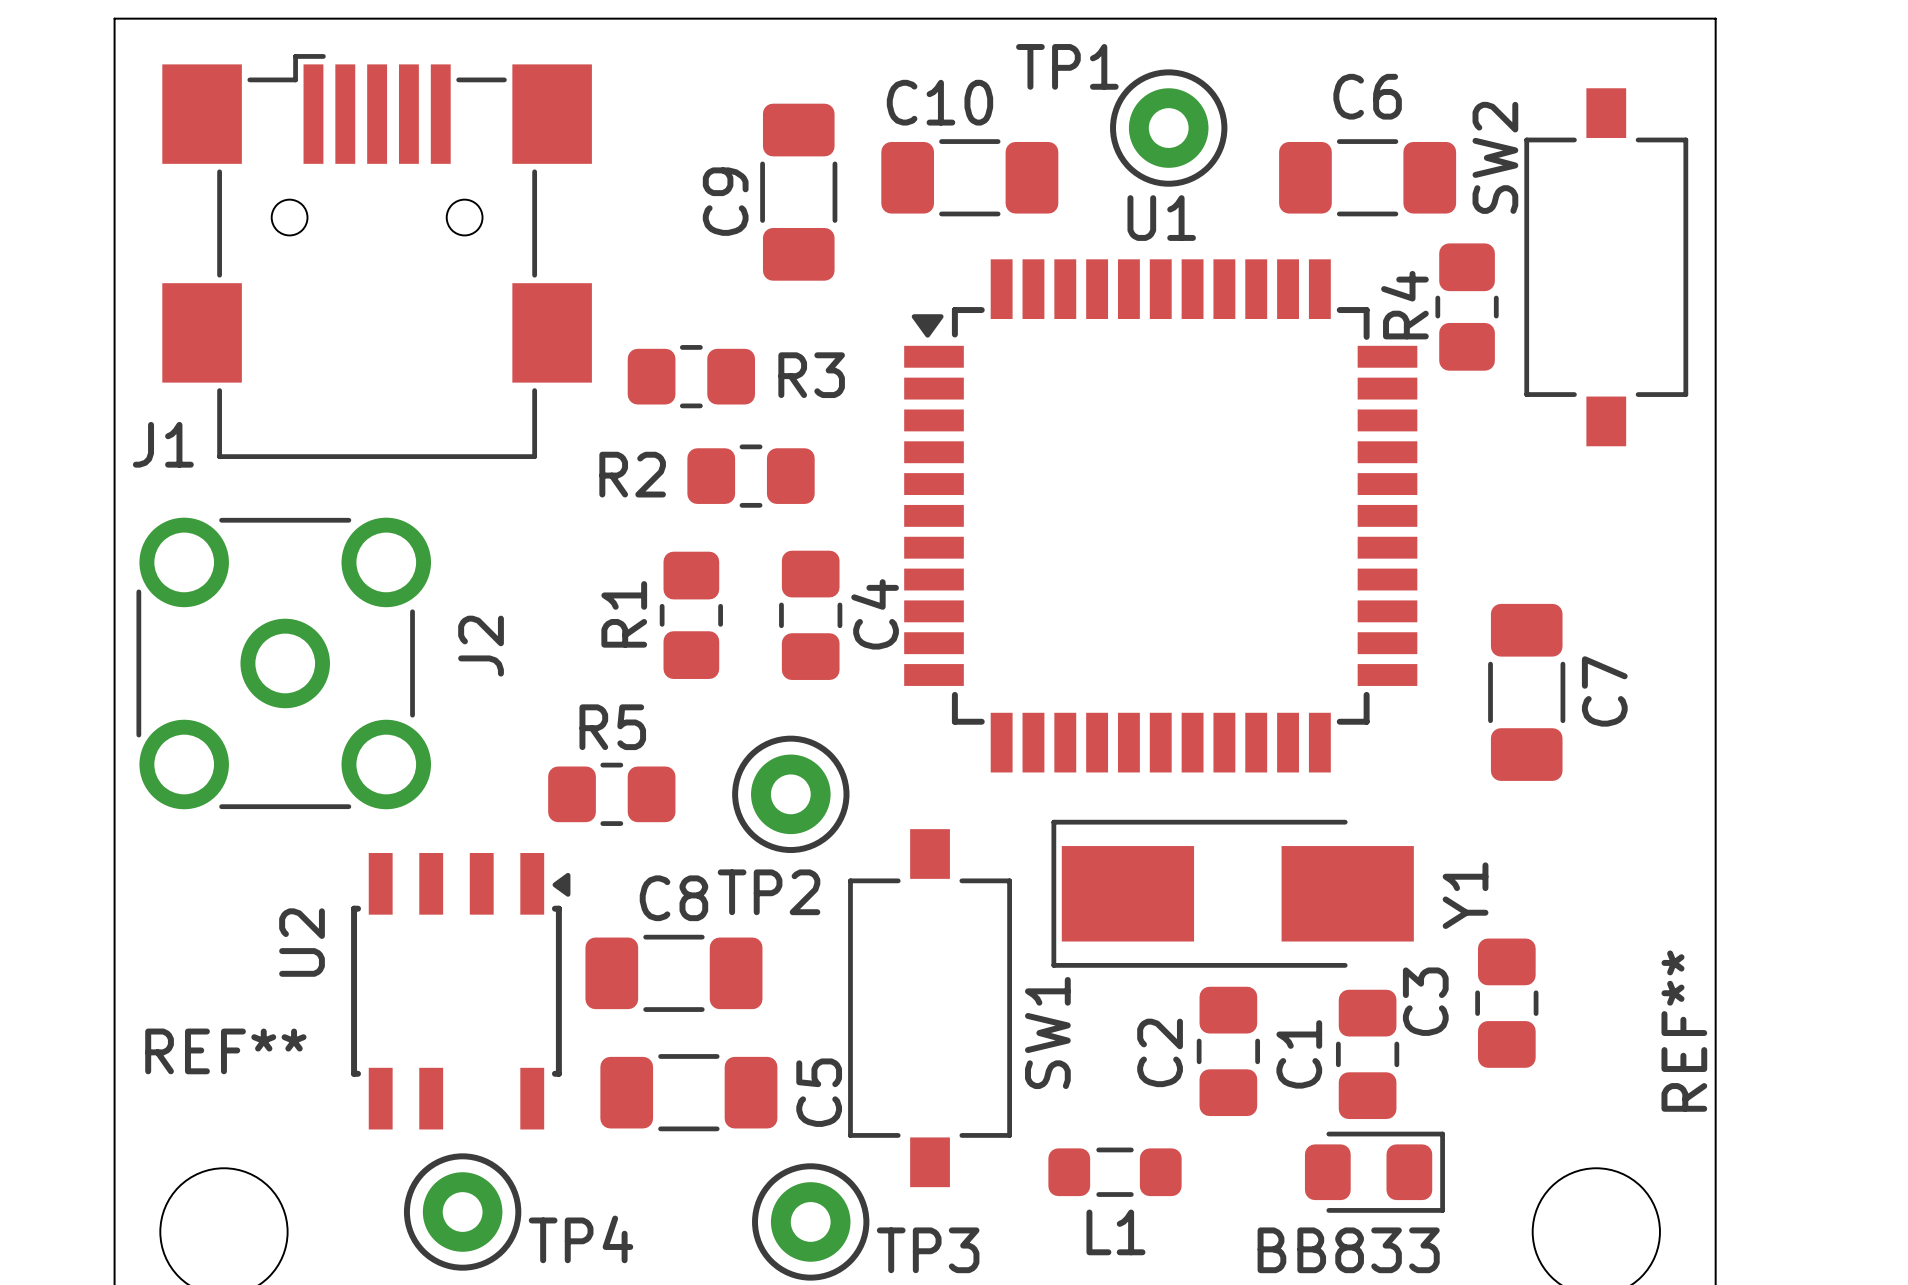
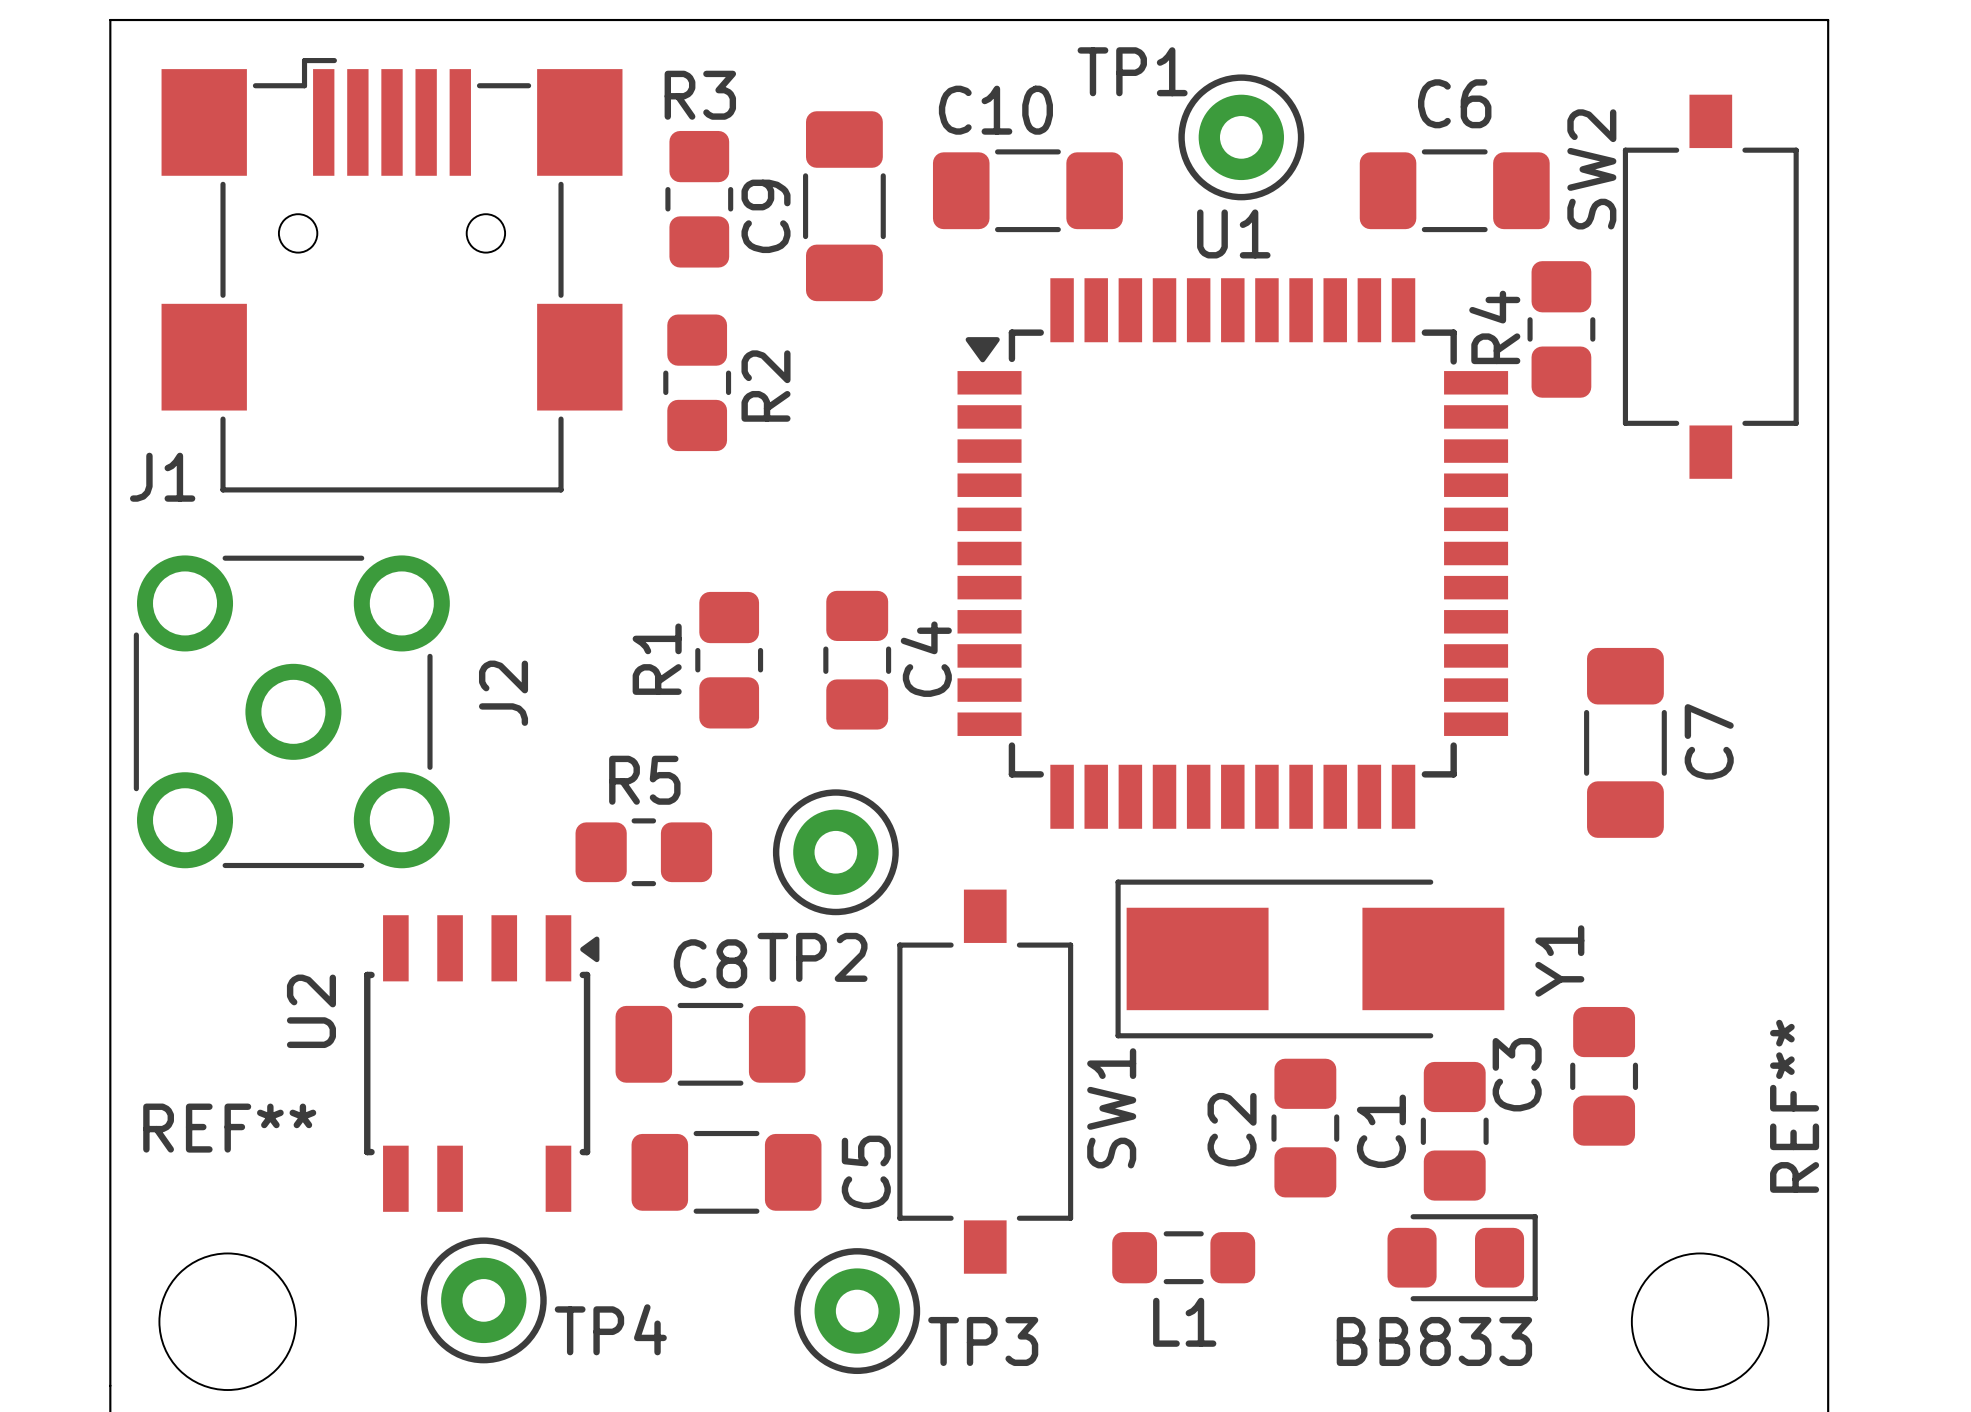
R3 name position: R3 (811, 375) -> R3 (700, 95)
R3 rotation: 0° (691, 376) -> 90° clockwise (699, 199)
R3 position: (691, 376) -> (699, 199)
R2 name position: R2 (632, 474) -> R2 (765, 386)
R2 rotation: 0° (751, 476) -> 90° clockwise (697, 382)
R2 position: (751, 476) -> (697, 382)

